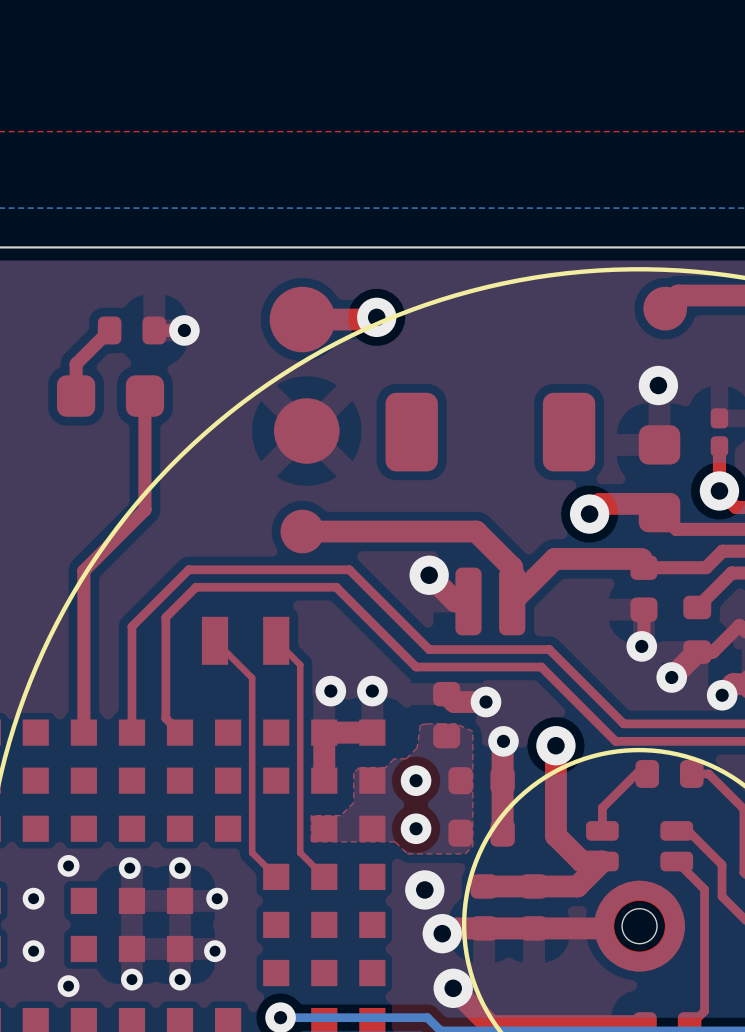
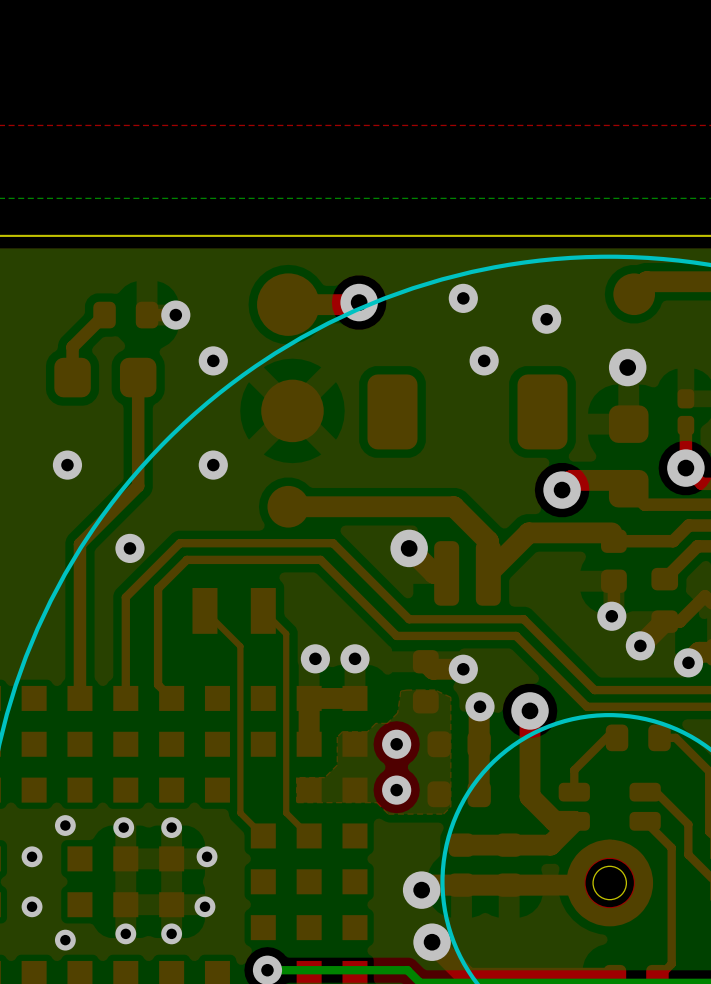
via: none -> (463, 298)
via: none -> (546, 319)
via: none -> (213, 360)
via: none -> (484, 360)
via: none -> (67, 465)
via: none -> (213, 465)
via: none -> (129, 548)
via: (424, 889) -> none

